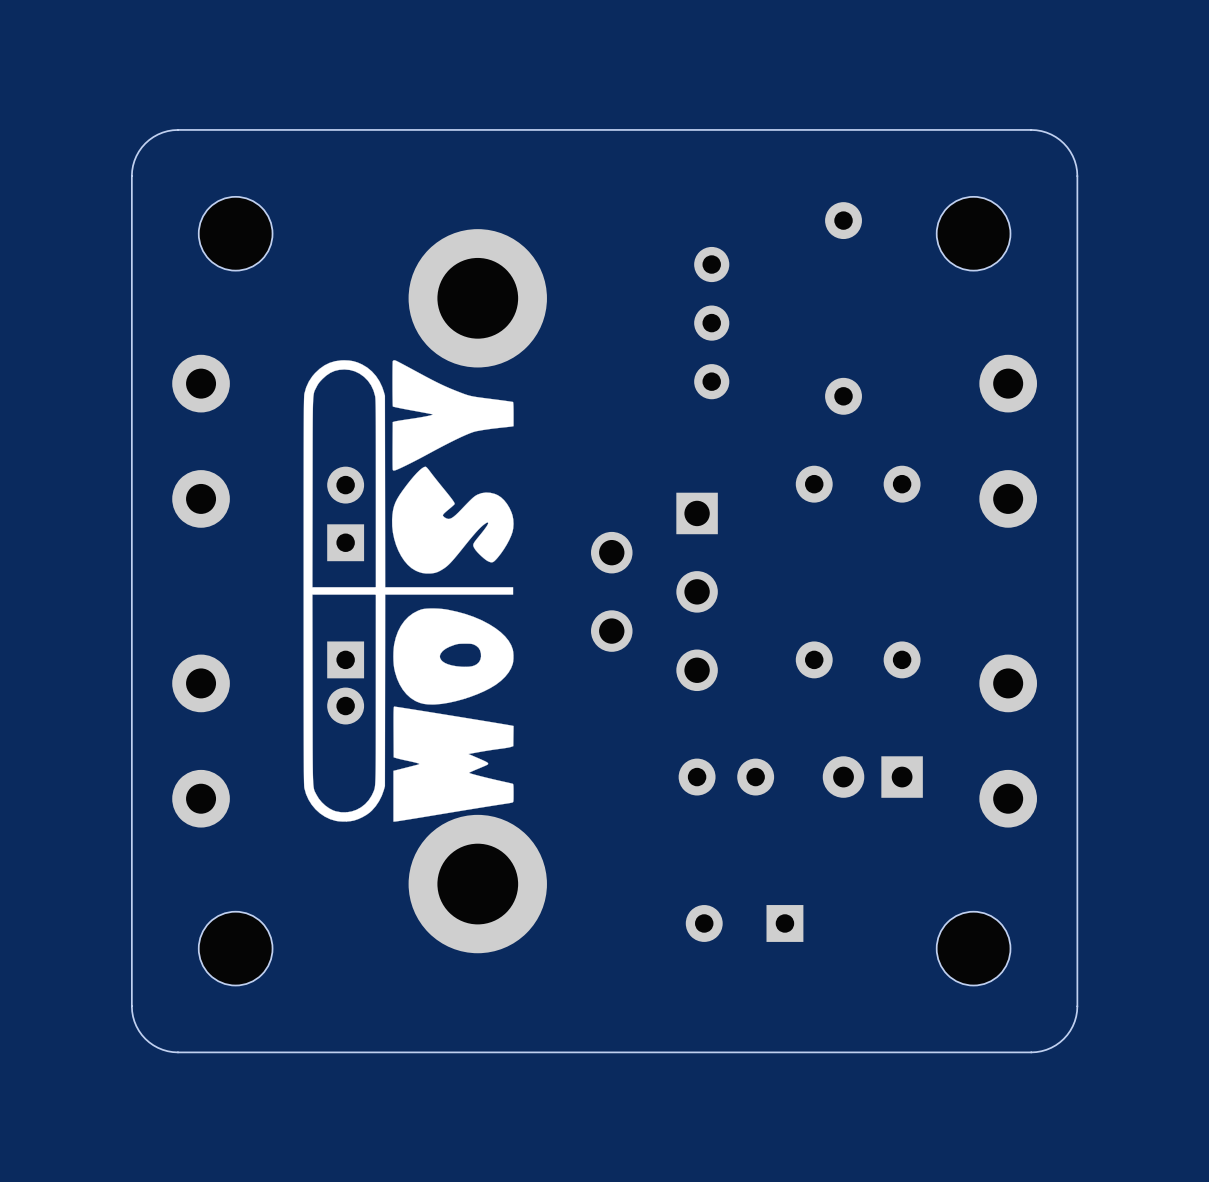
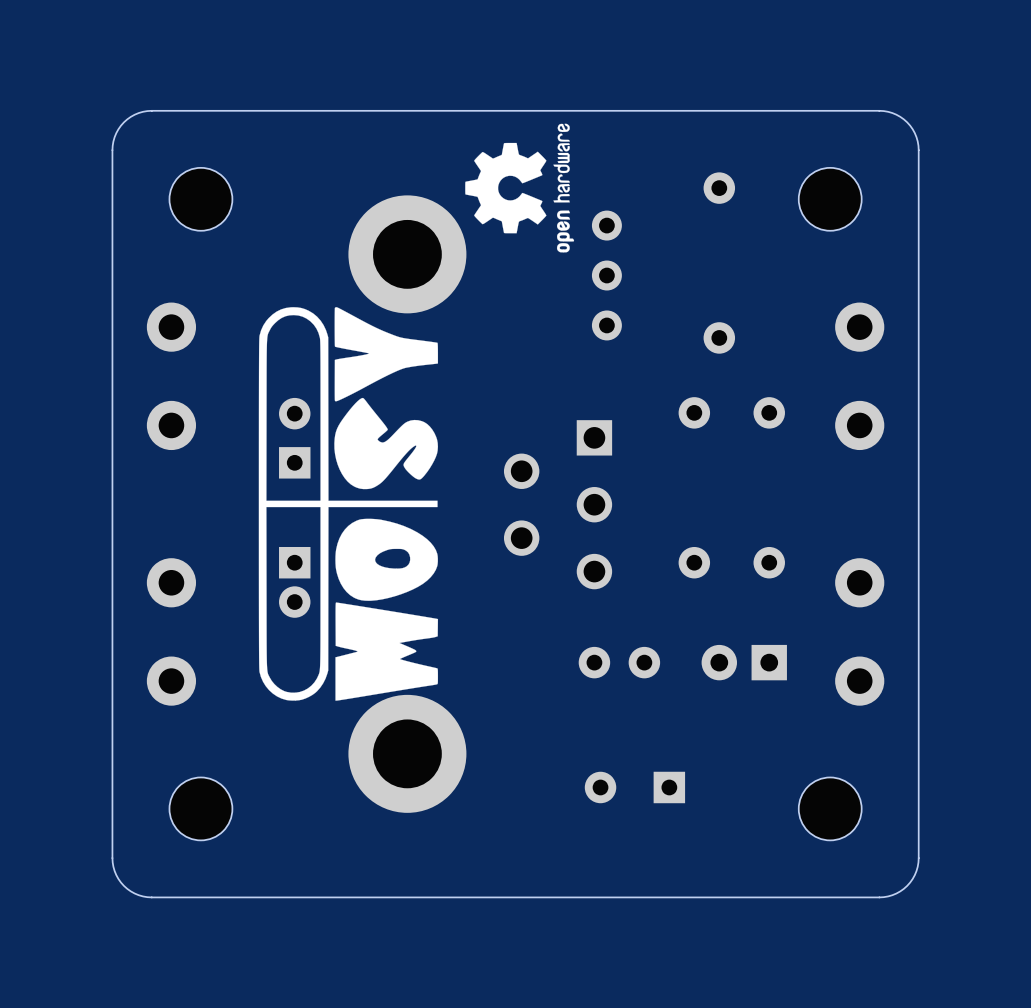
drawing: none -> [465, 123, 575, 253]

